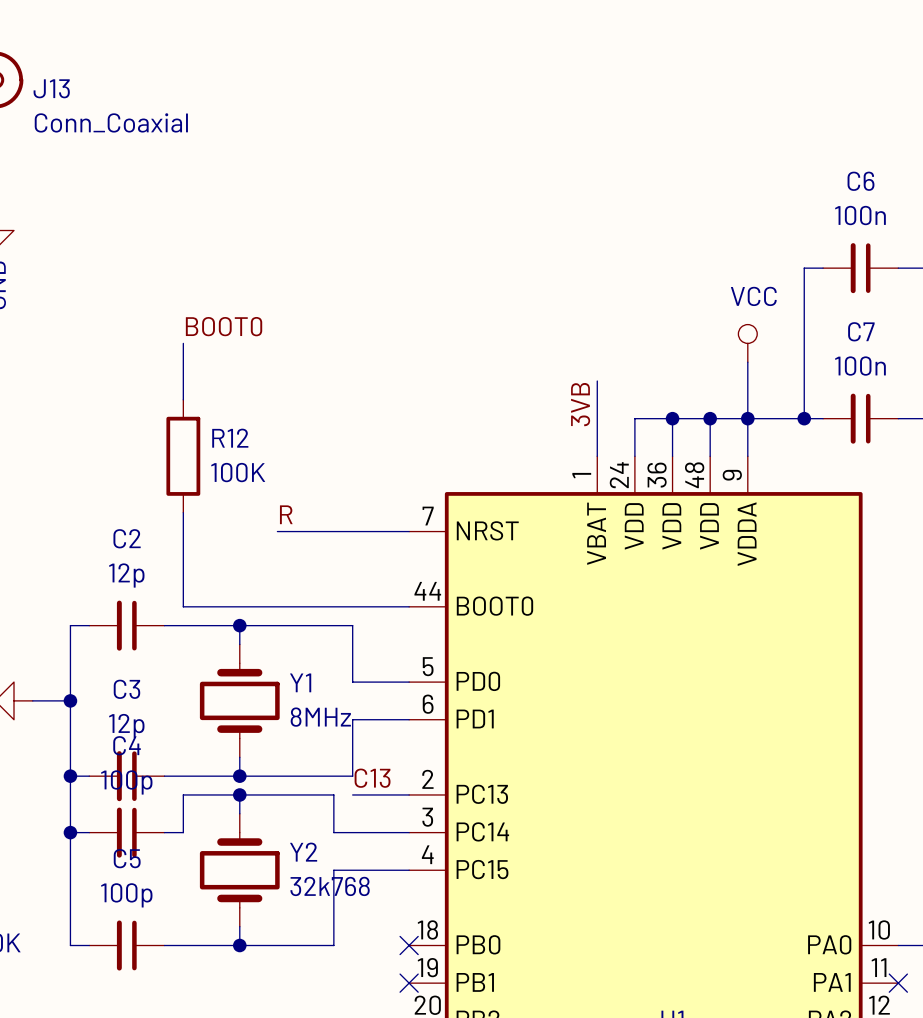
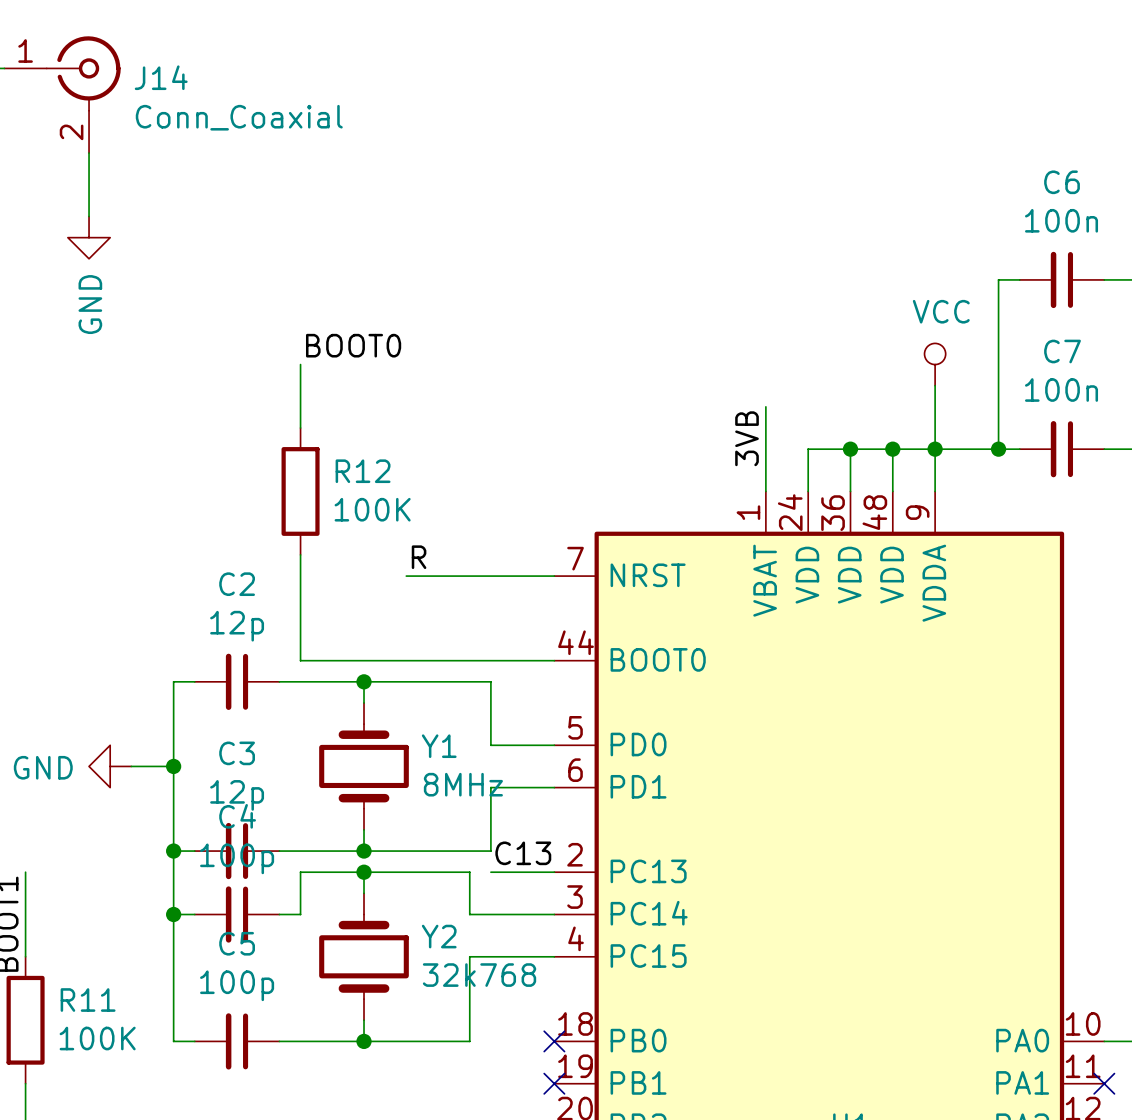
J13 name: J13 (51, 88) -> J14 (161, 77)

